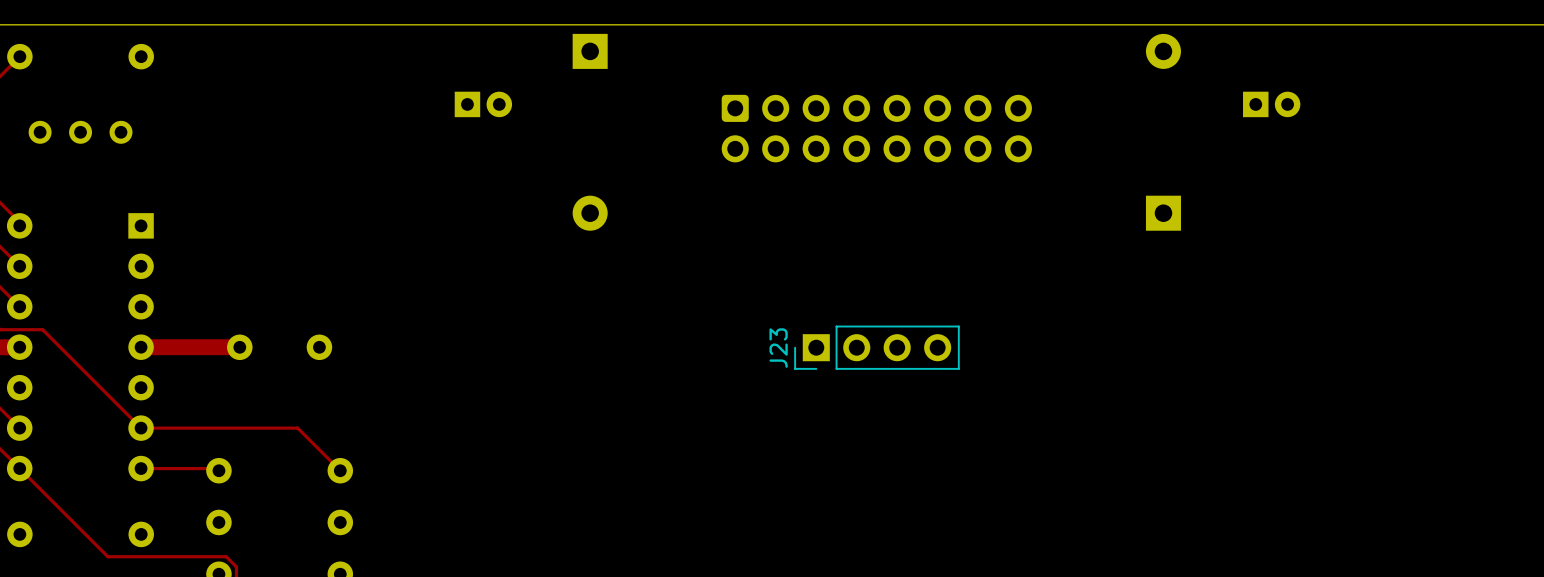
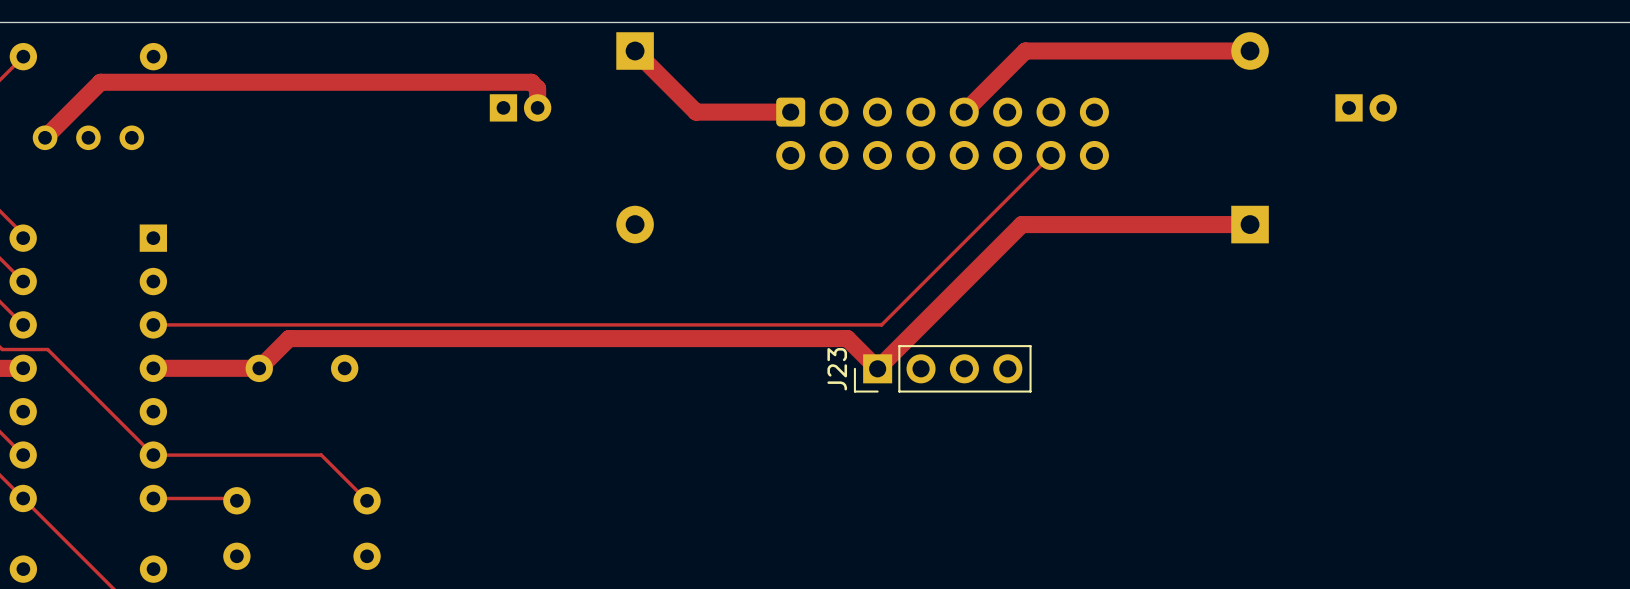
track: none -> (635, 51) (696, 112) (790, 112)
track: none -> (1250, 51) (1025, 51) (964, 112)
track: none -> (537, 107) (537, 88) (531, 82) (100, 82) (45, 137)
track: none -> (1051, 155) (881, 324) (153, 324)
track: none -> (1250, 224) (1021, 224) (877, 368) (847, 338) (289, 338) (259, 368)

